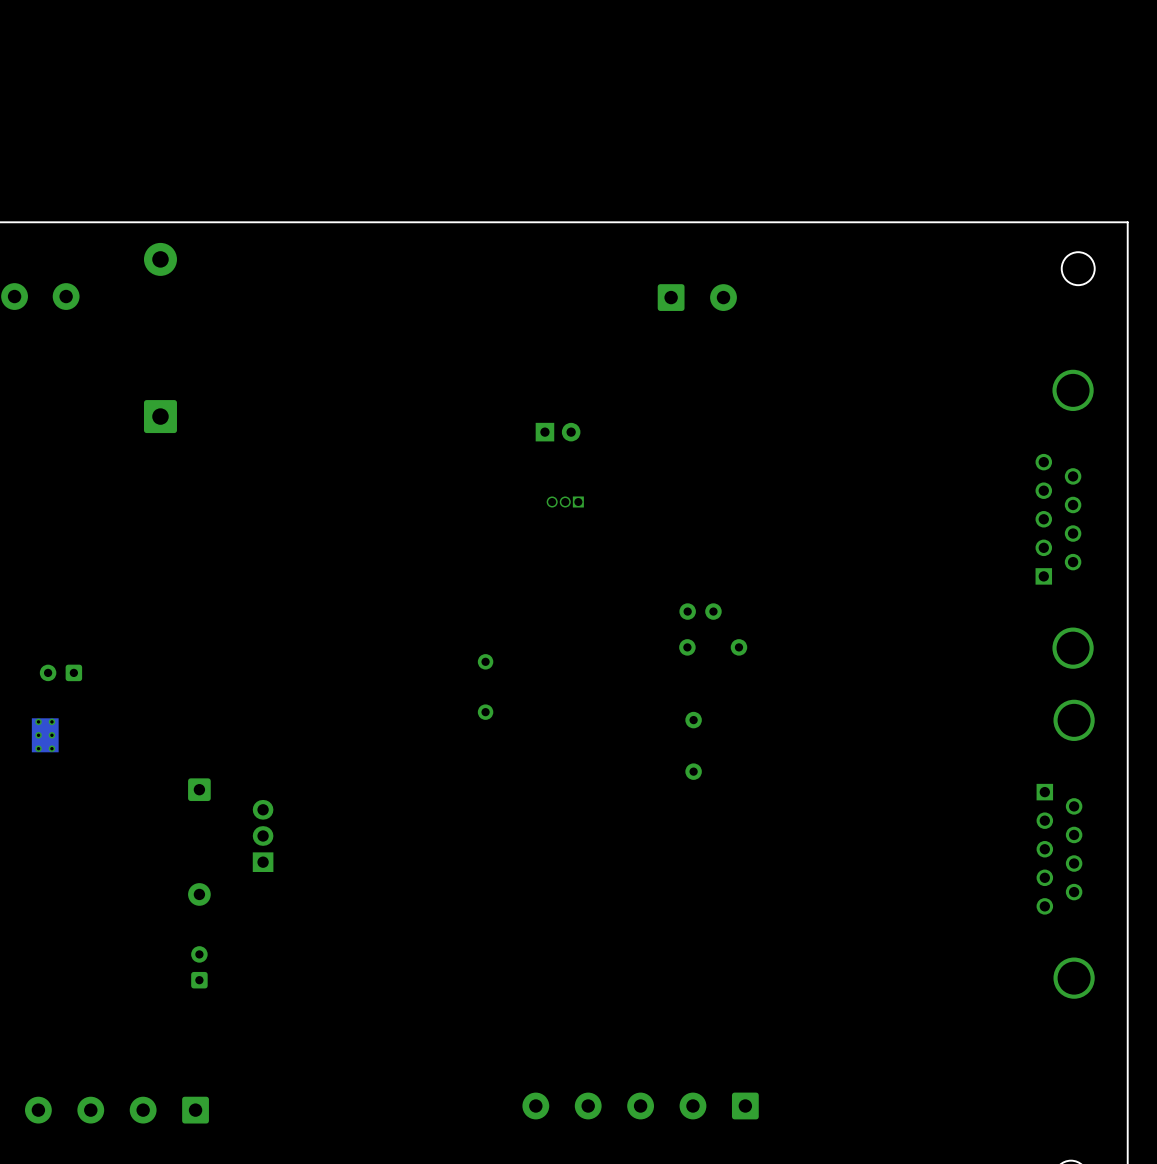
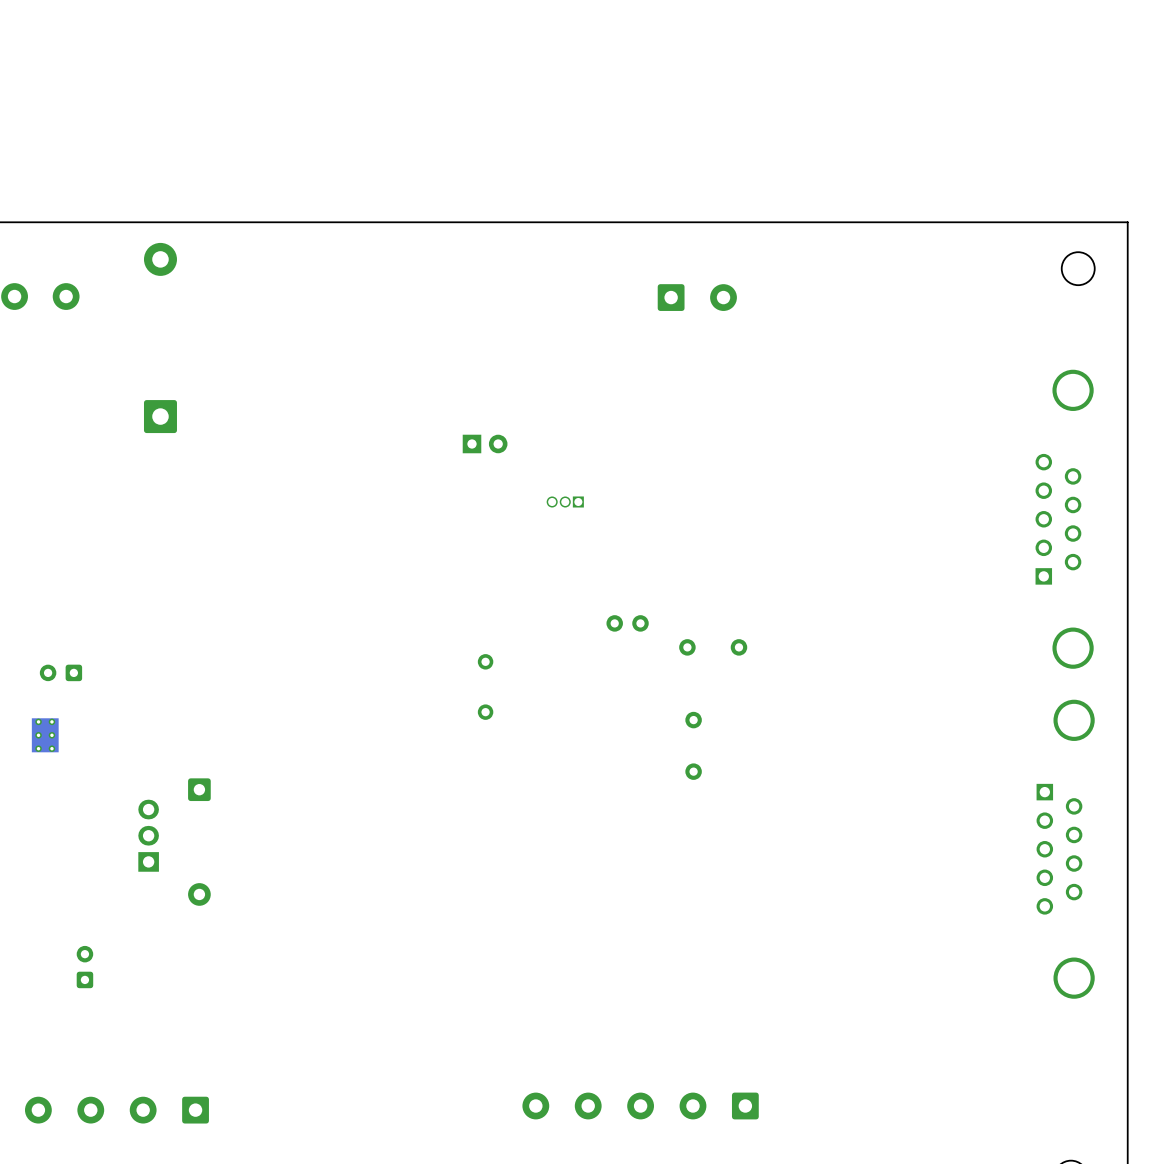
part position: (558, 432) -> (485, 443)
part position: (700, 611) -> (627, 623)
part position: (263, 835) -> (148, 835)
part position: (199, 967) -> (84, 967)

